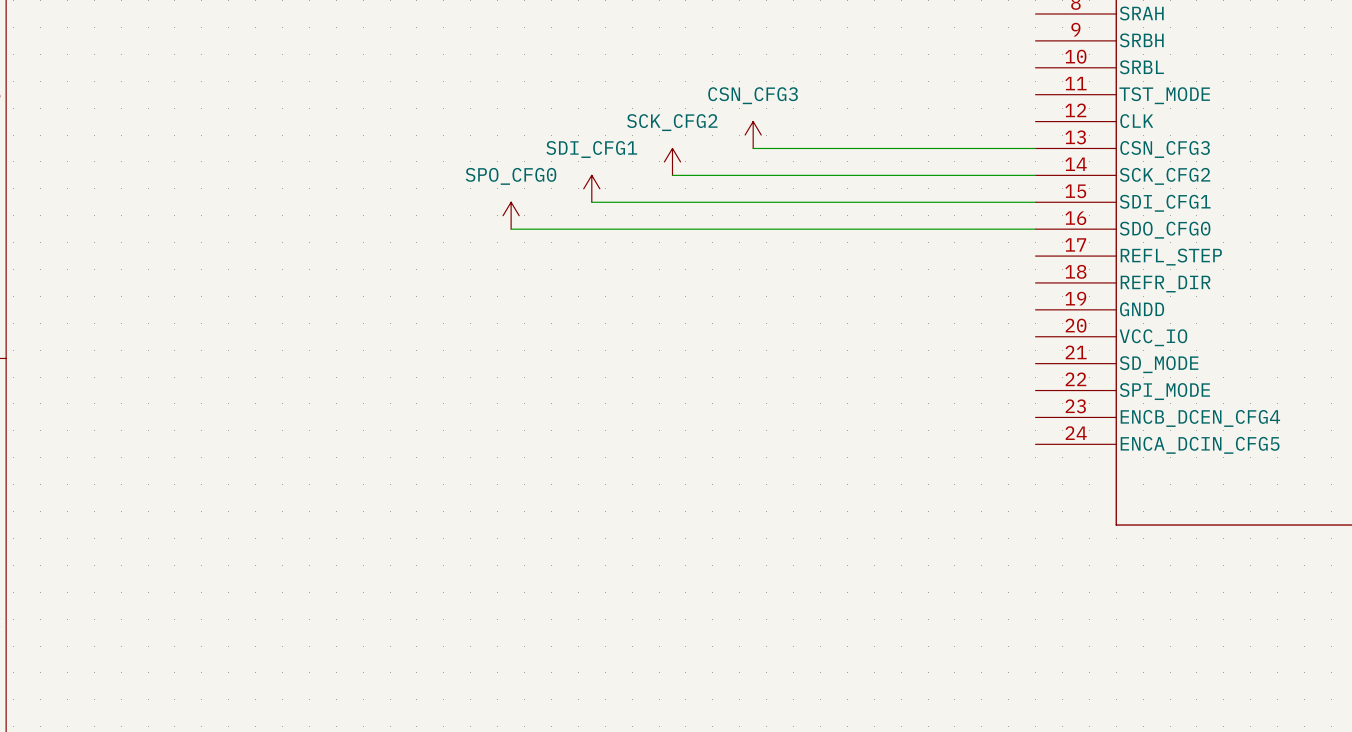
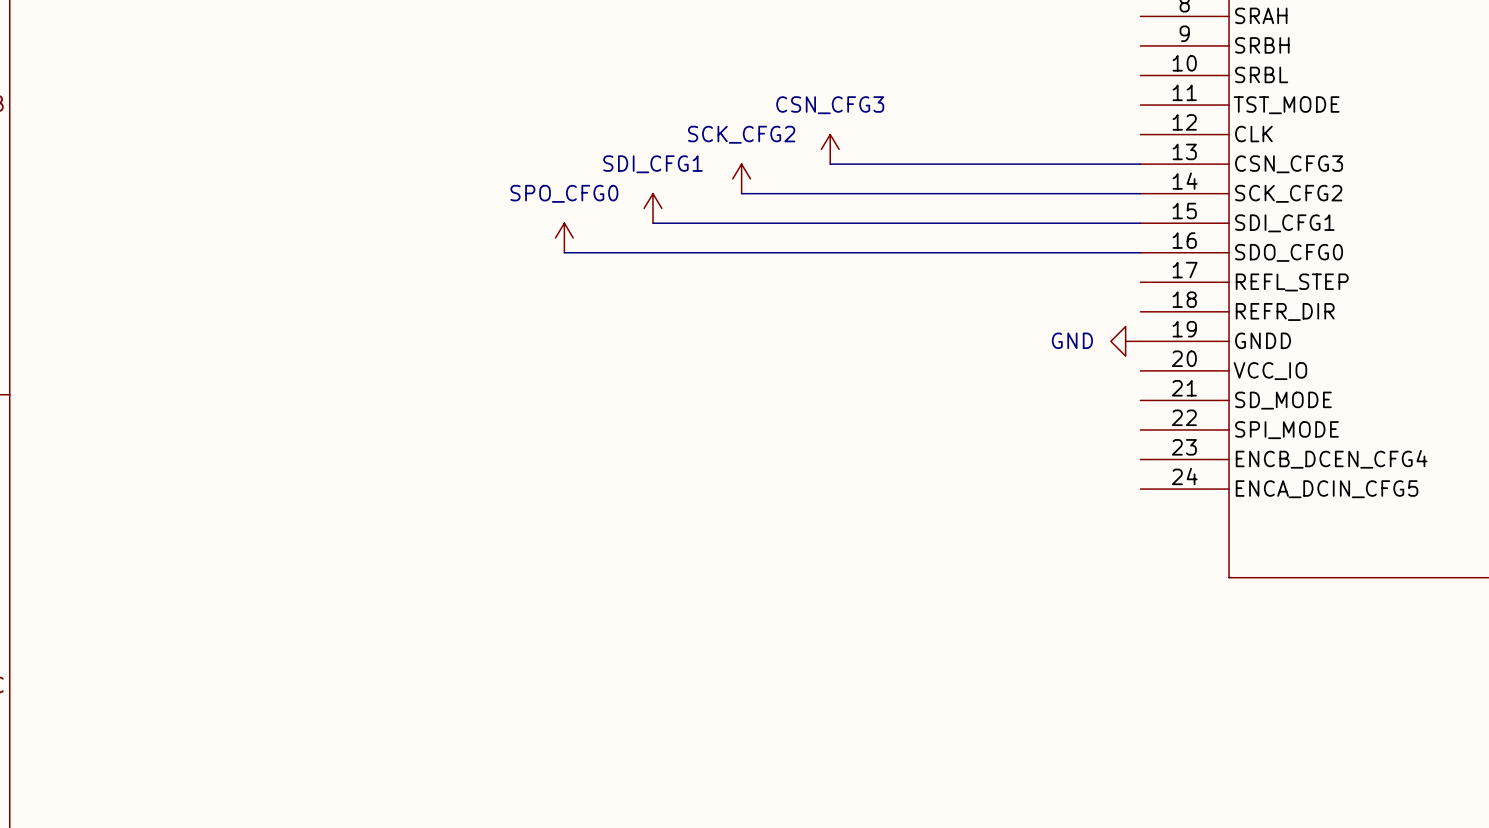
power symbol: none -> GND (1125, 341)

